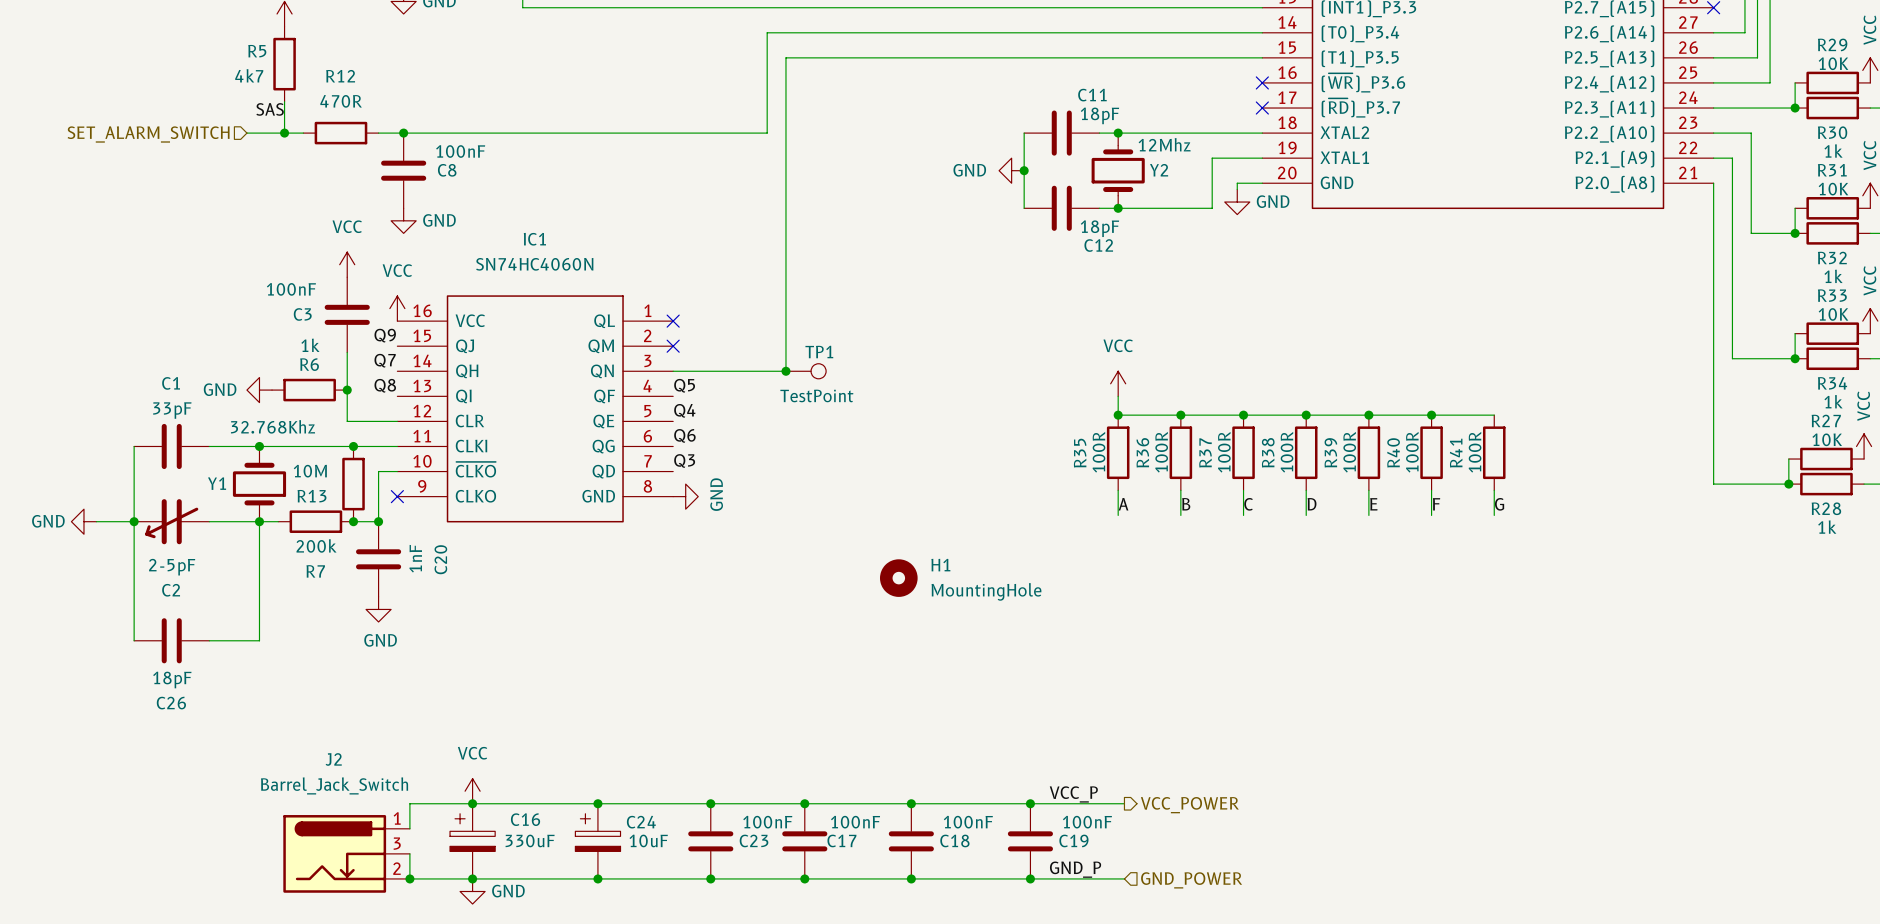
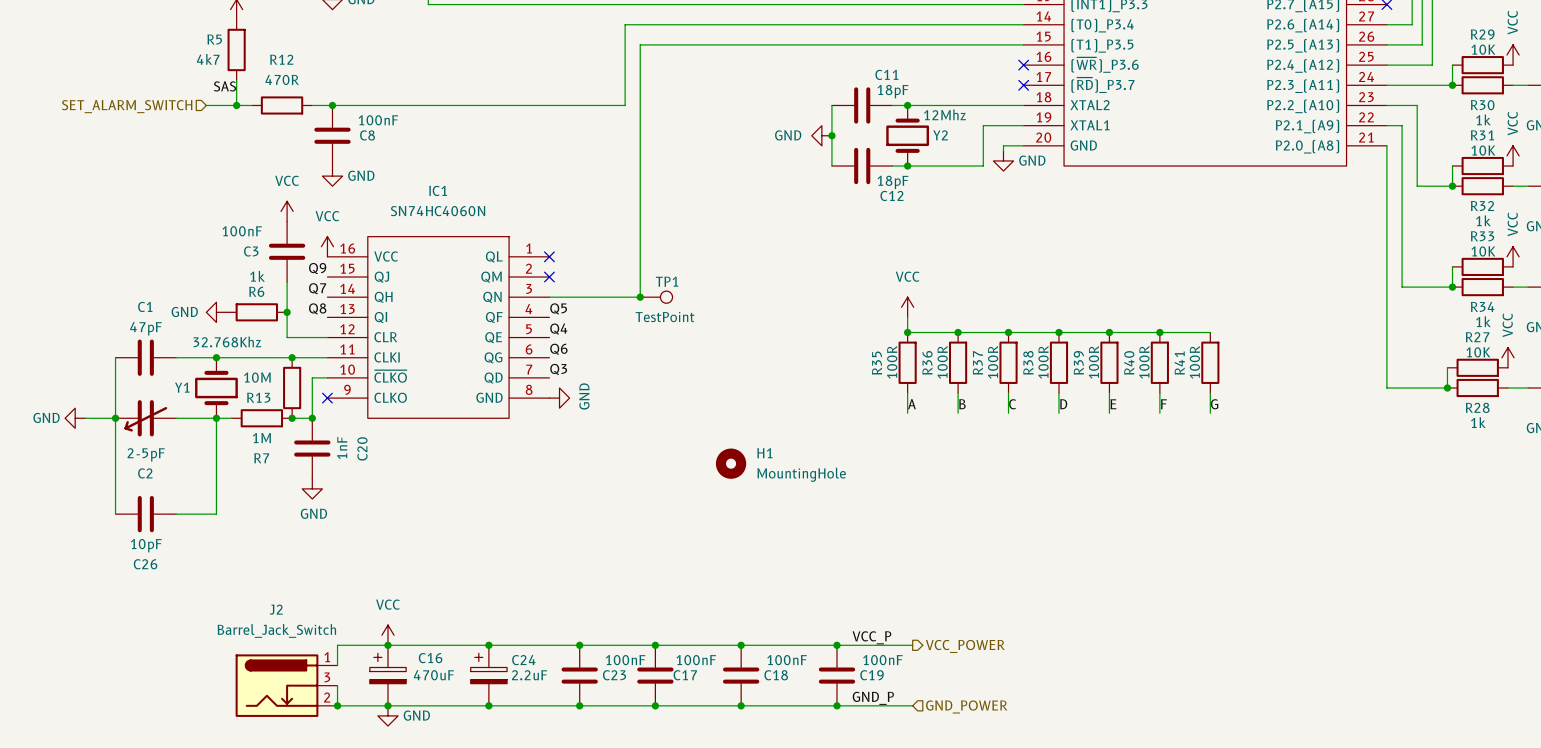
C1 value: 33pF (172, 410) -> 47pF (145, 328)
R7 value: 200k (316, 545) -> 1M (261, 438)
C26 value: 18pF (172, 679) -> 10pF (146, 545)
C16 value: 330uF (530, 840) -> 470uF (433, 675)
C24 value: 10uF (648, 840) -> 2.2uF (529, 675)

